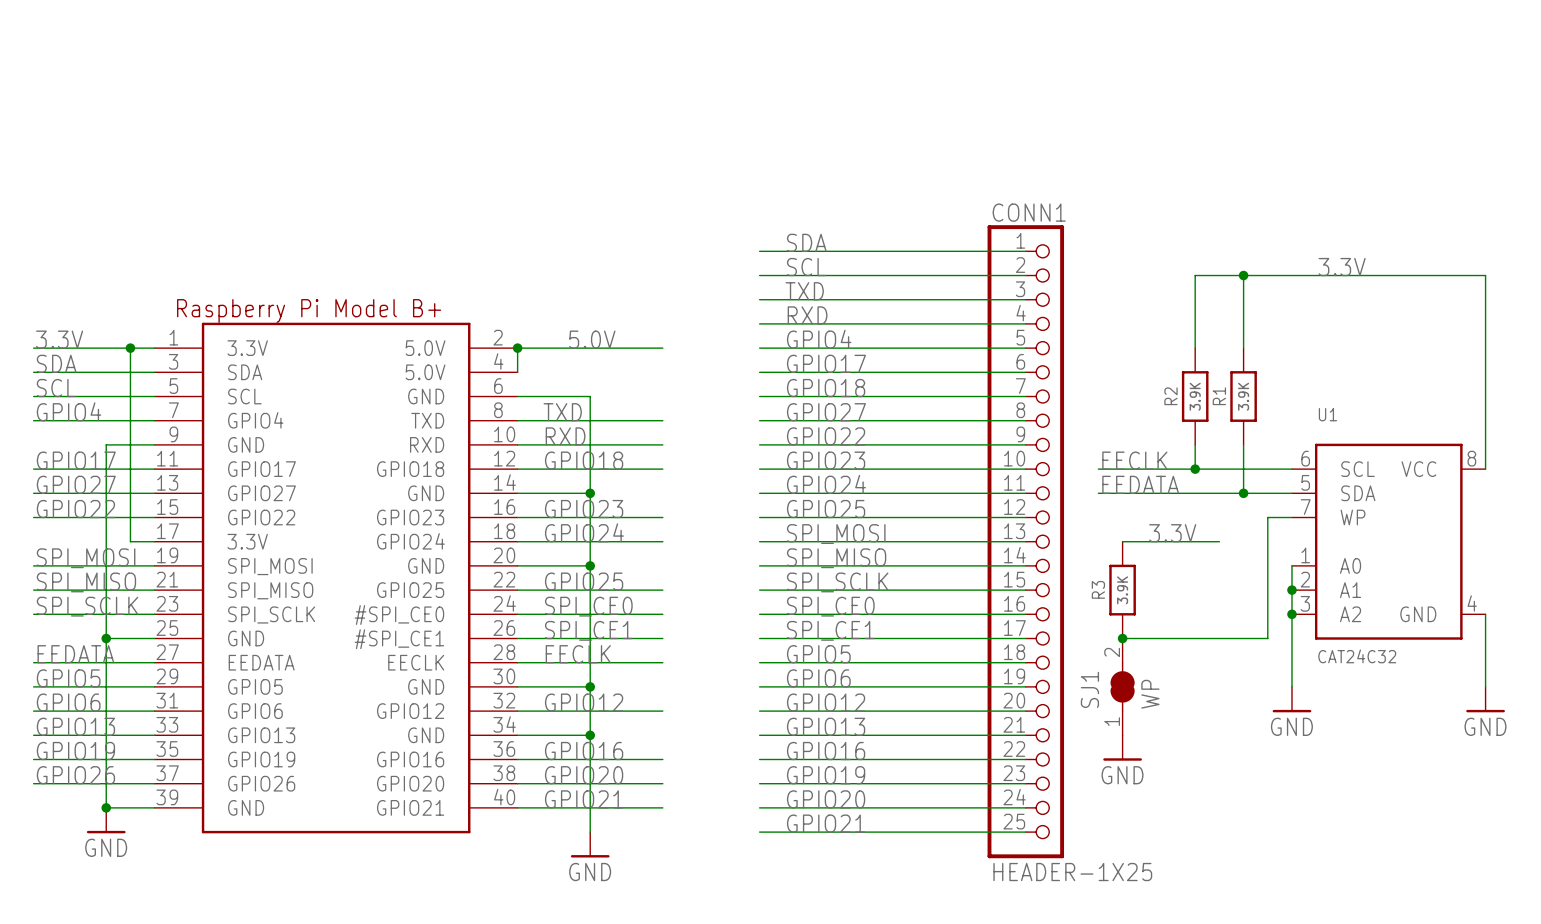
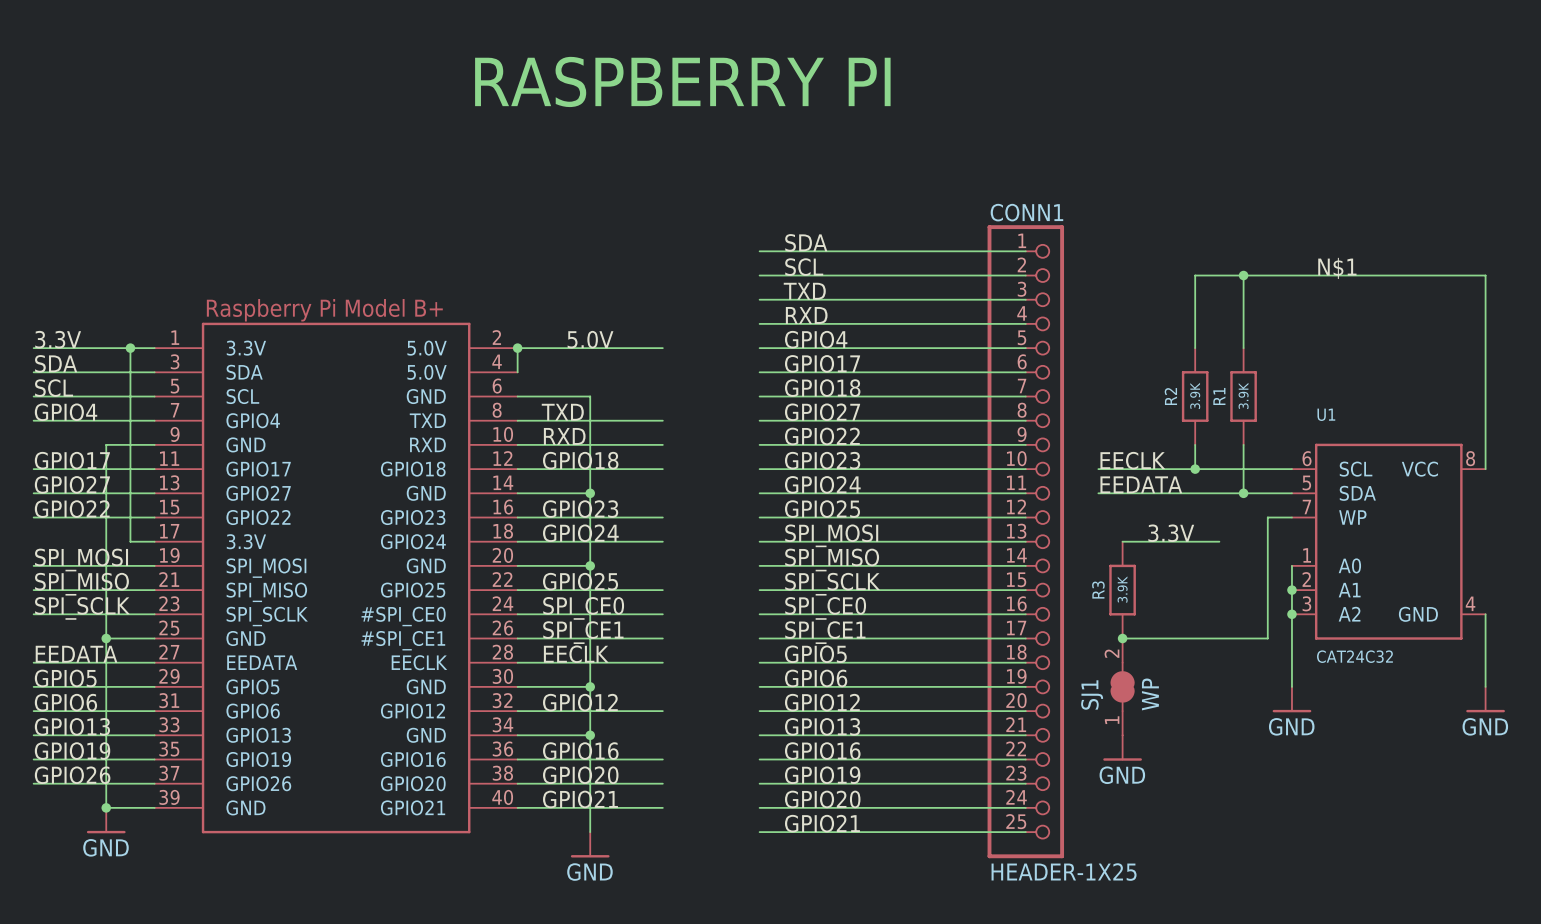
text: none -> RASPBERRY PI (682, 81)
label: 3.3V (1342, 267) -> N$1 (1337, 268)

